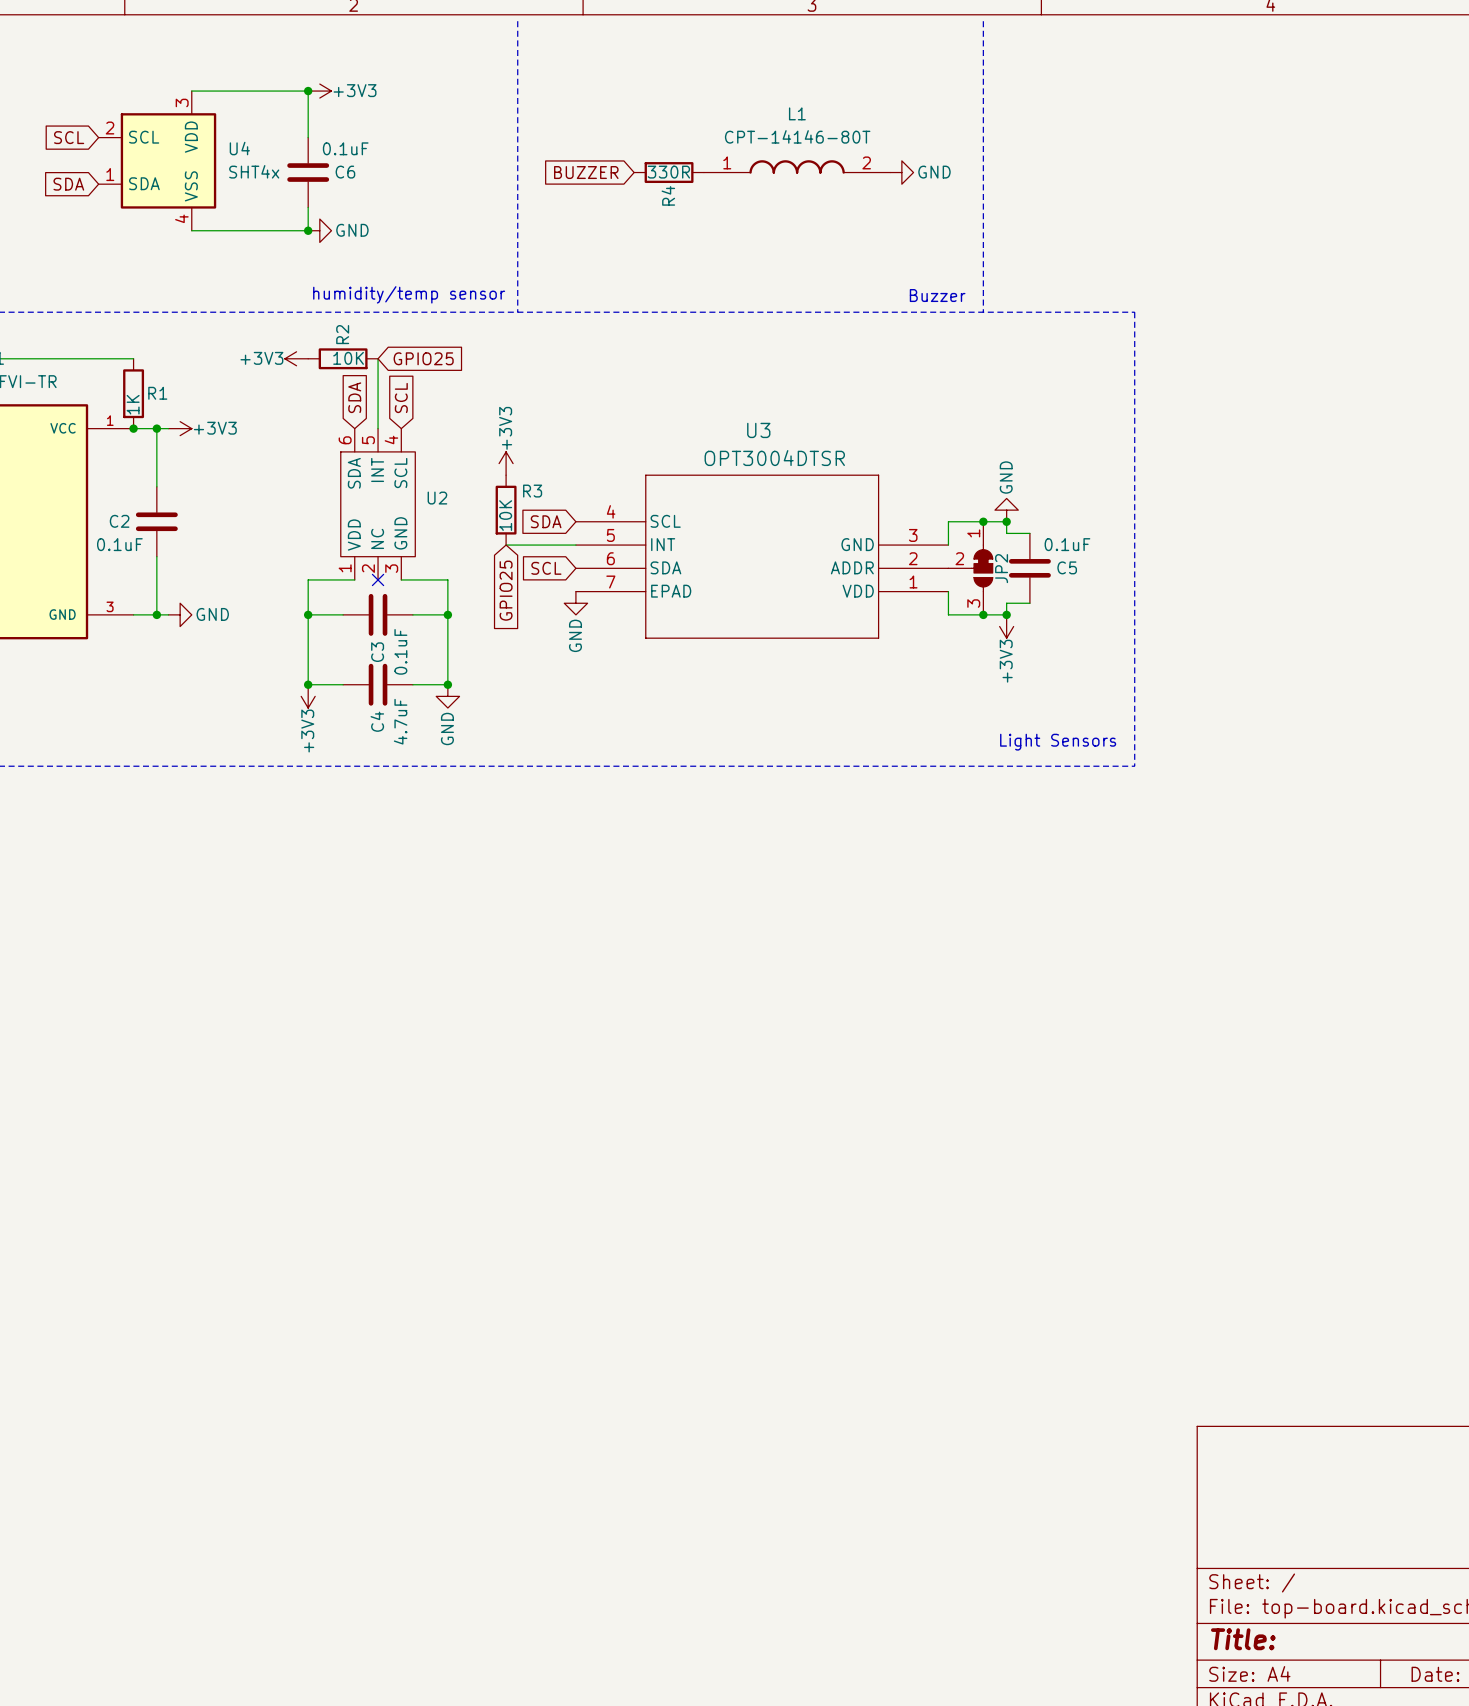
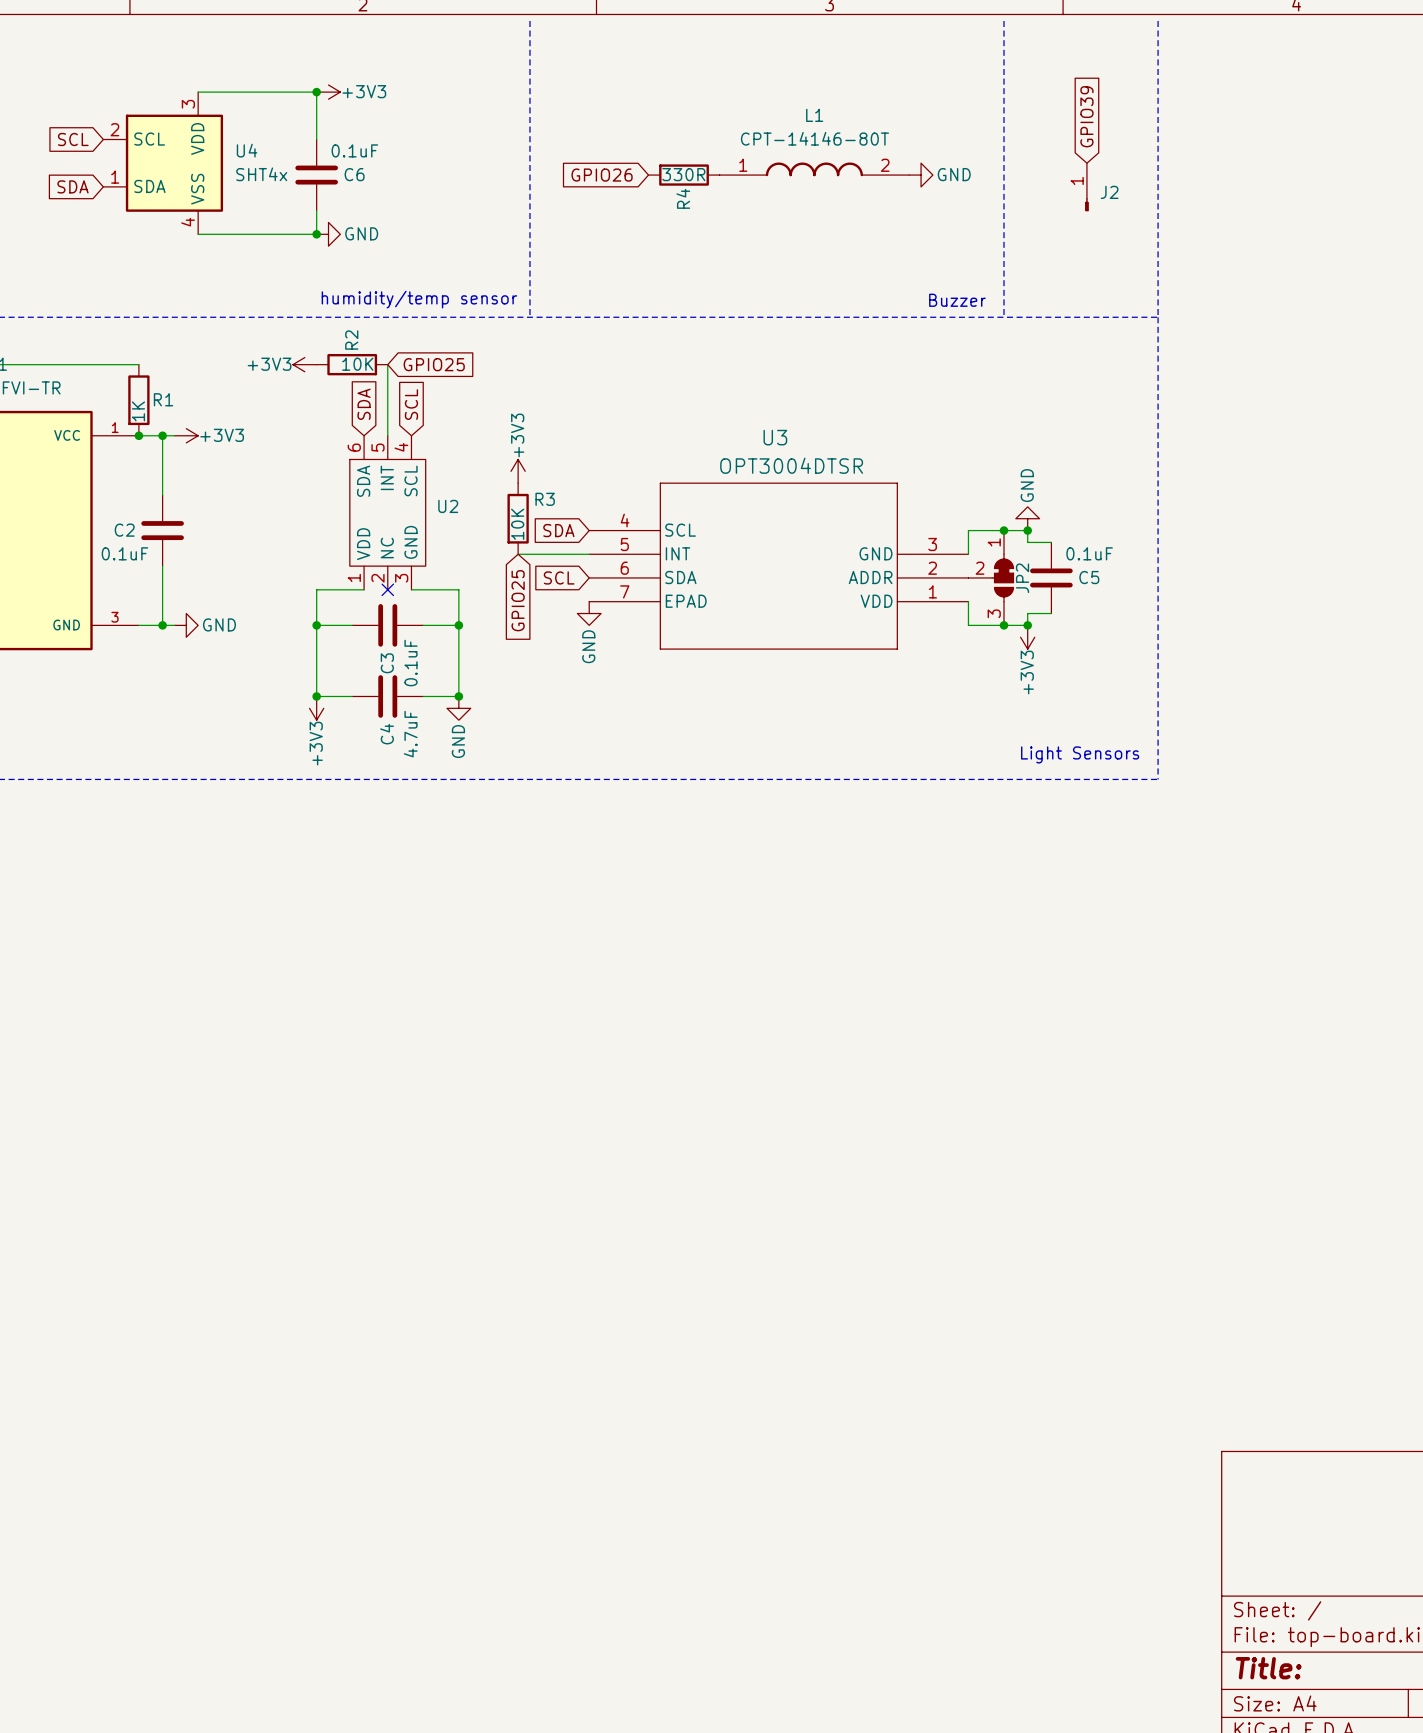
line: none -> (1158, 20) (1158, 317)
global label: none -> GPIO39 (1086, 116)
global label: BUZZER (586, 172) -> GPIO26 (602, 175)
J2: none -> (1086, 187)

